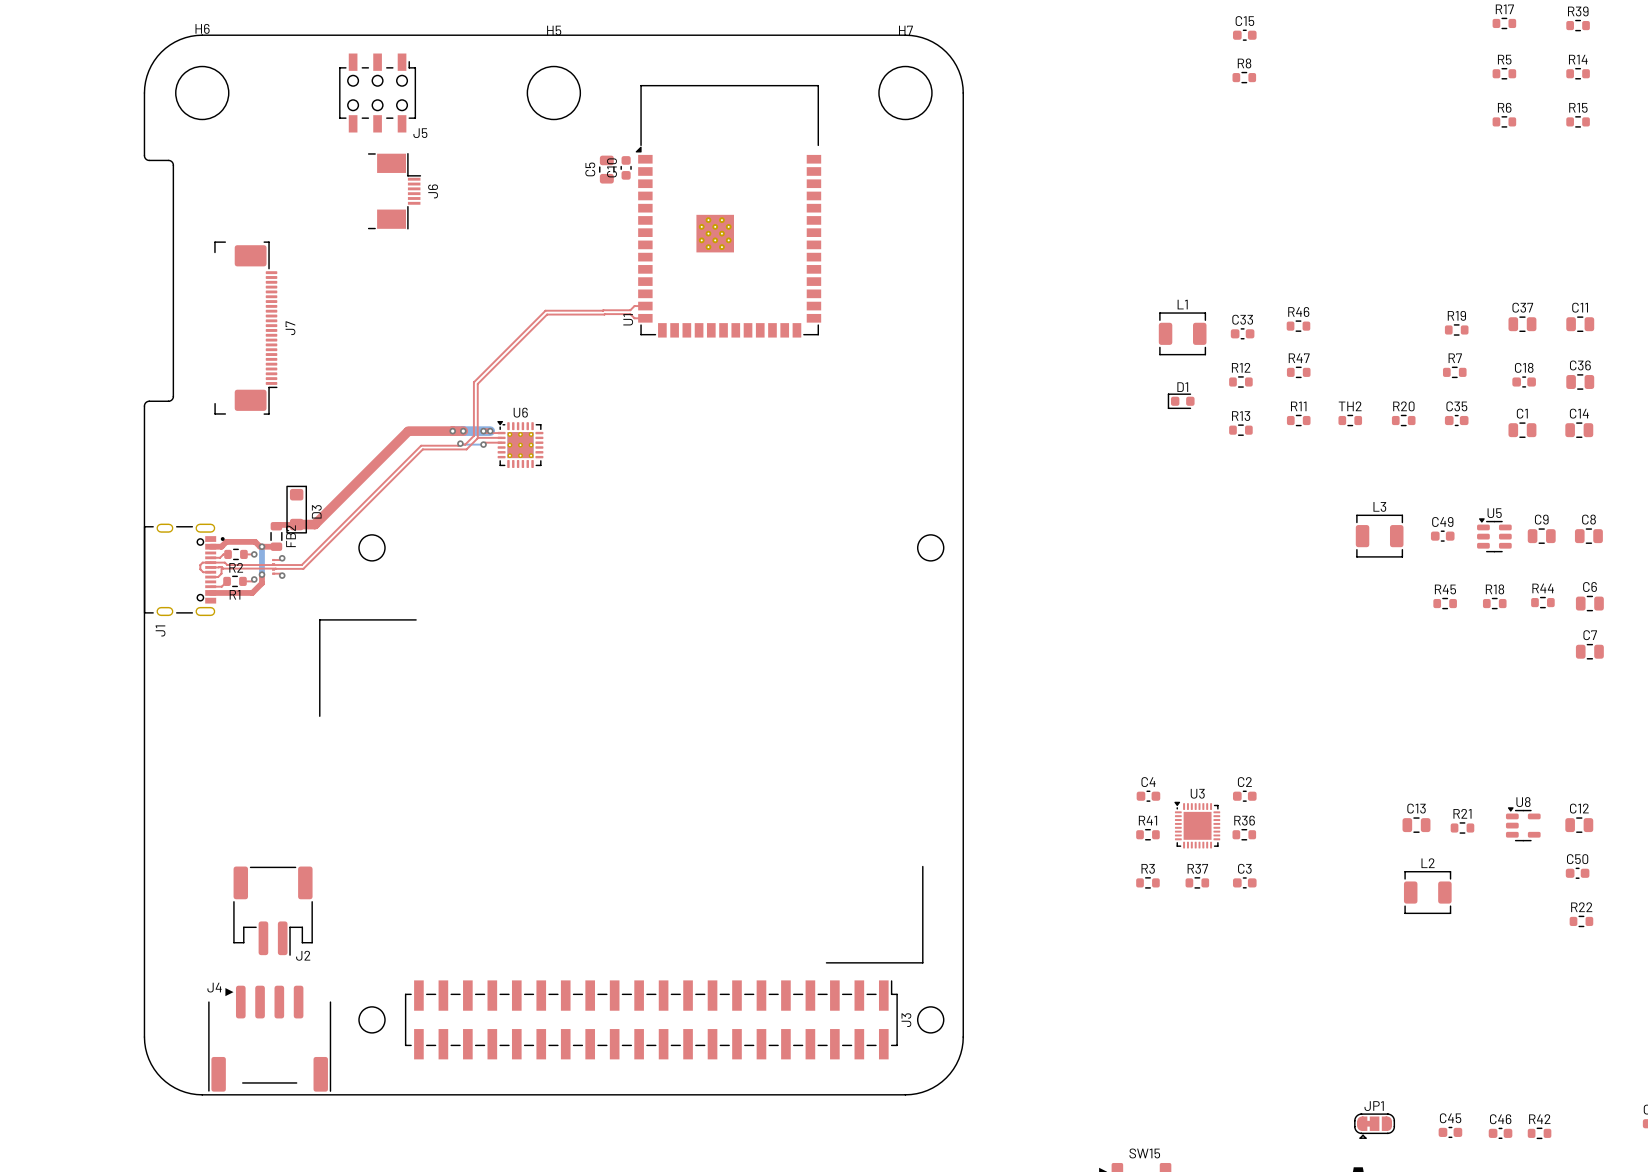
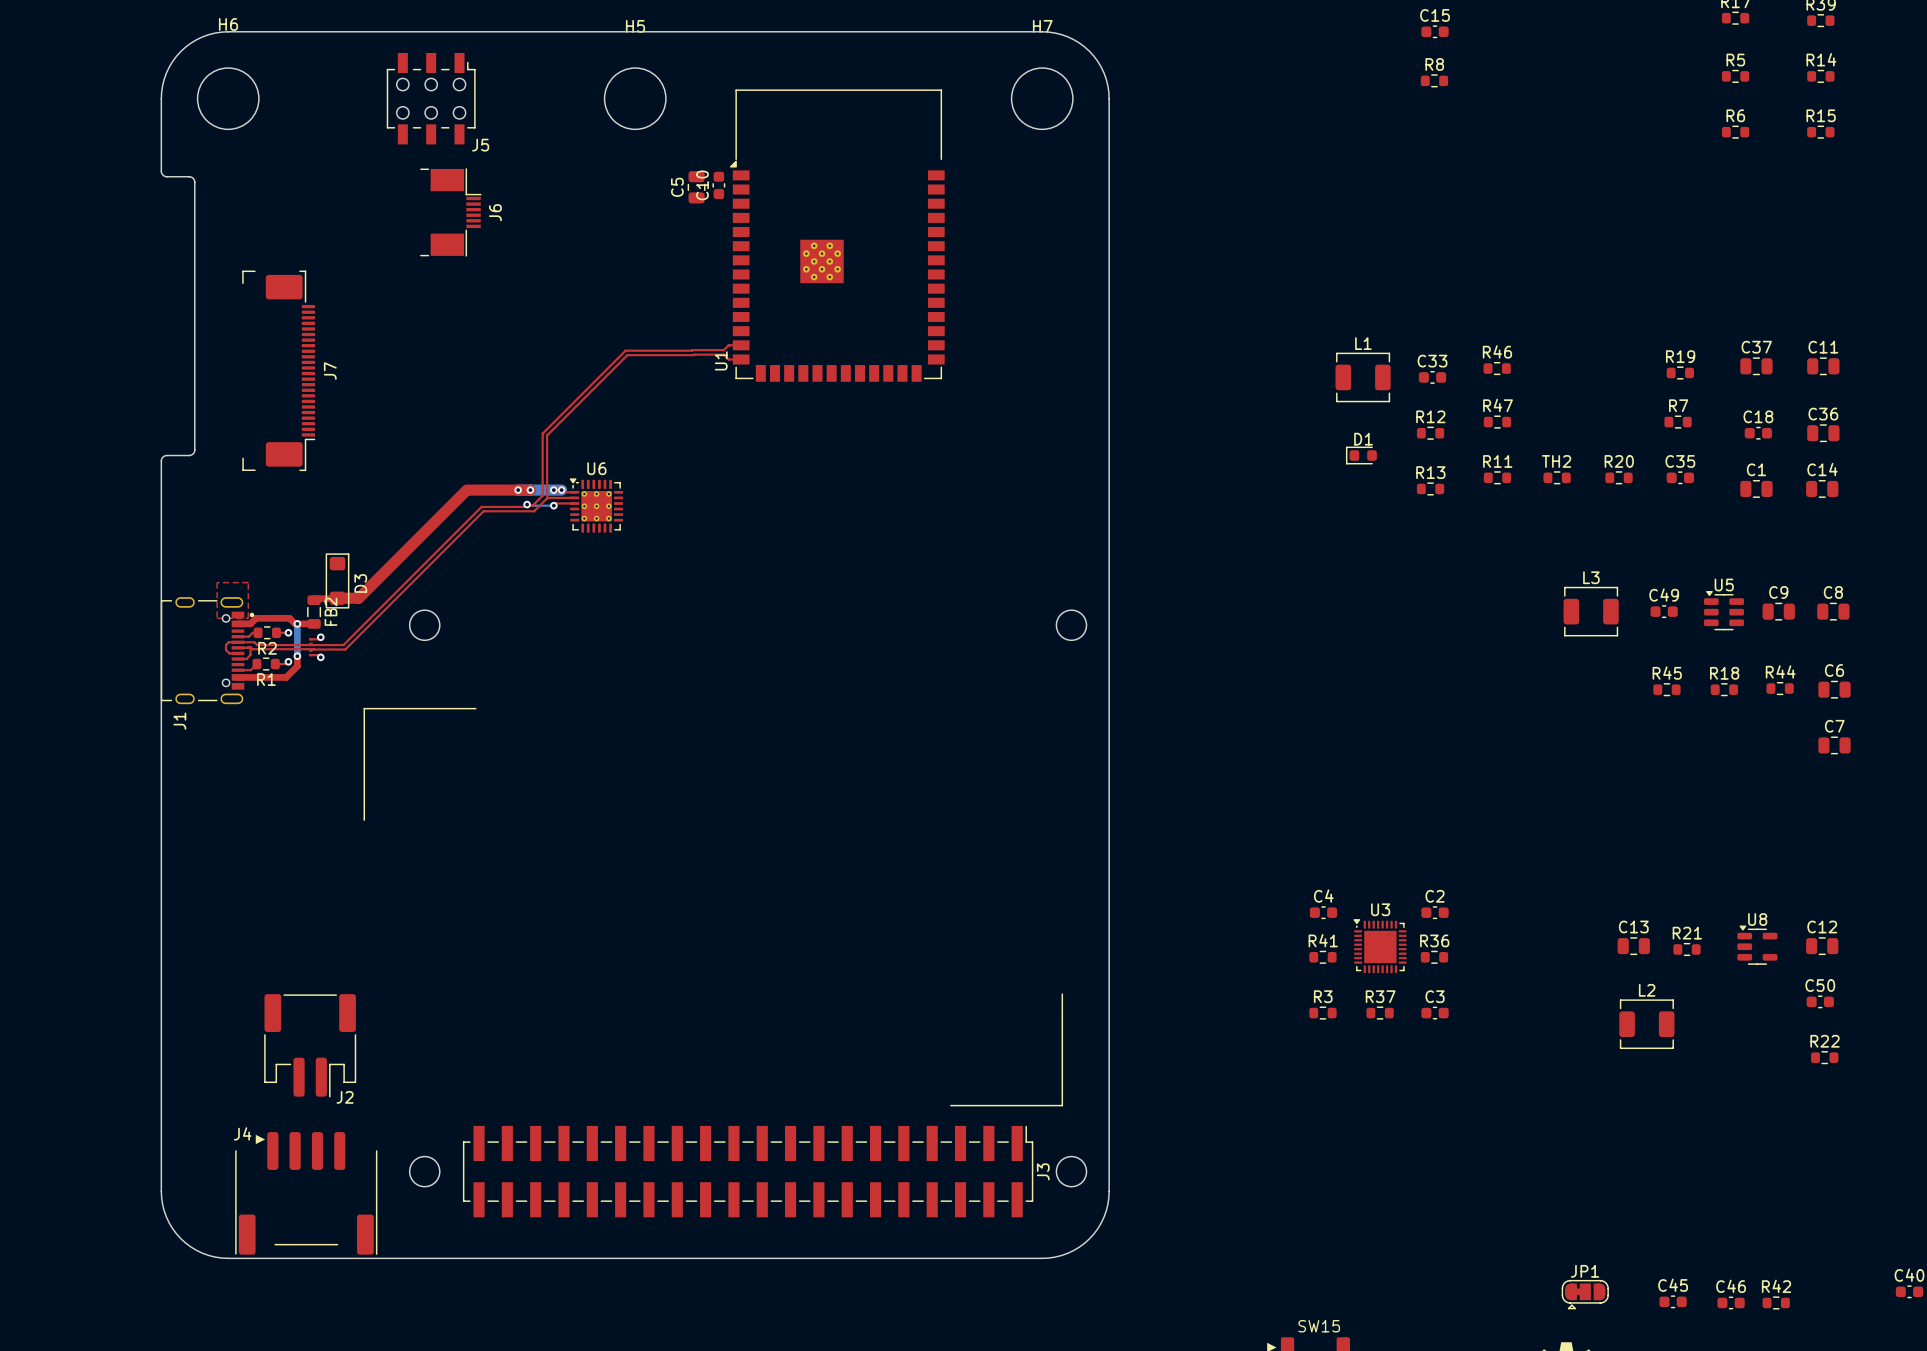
top zone outline: none -> (217, 582) (248, 582) (248, 618) (217, 618) (217, 582)

